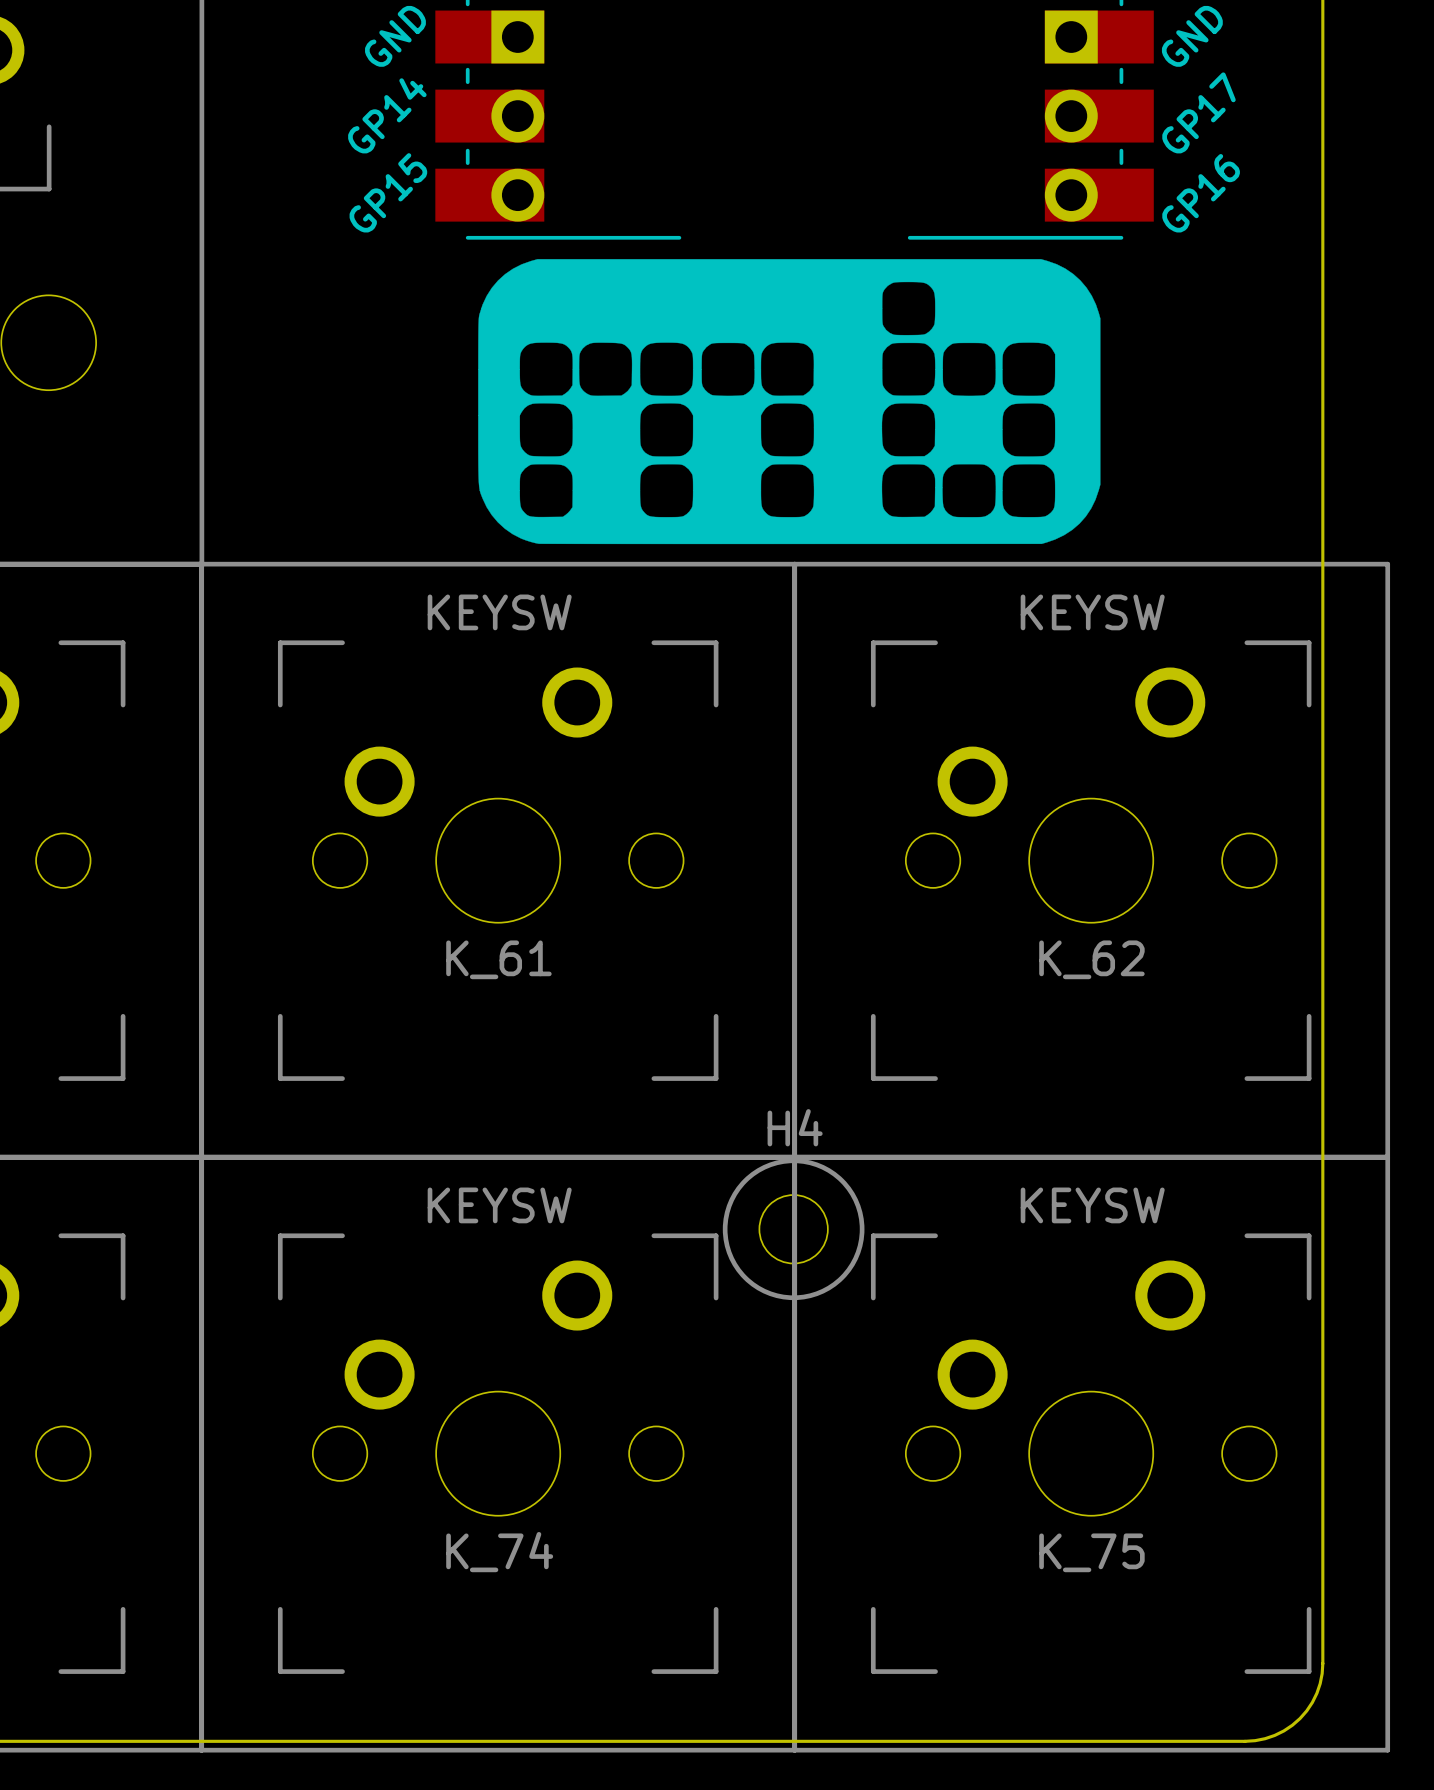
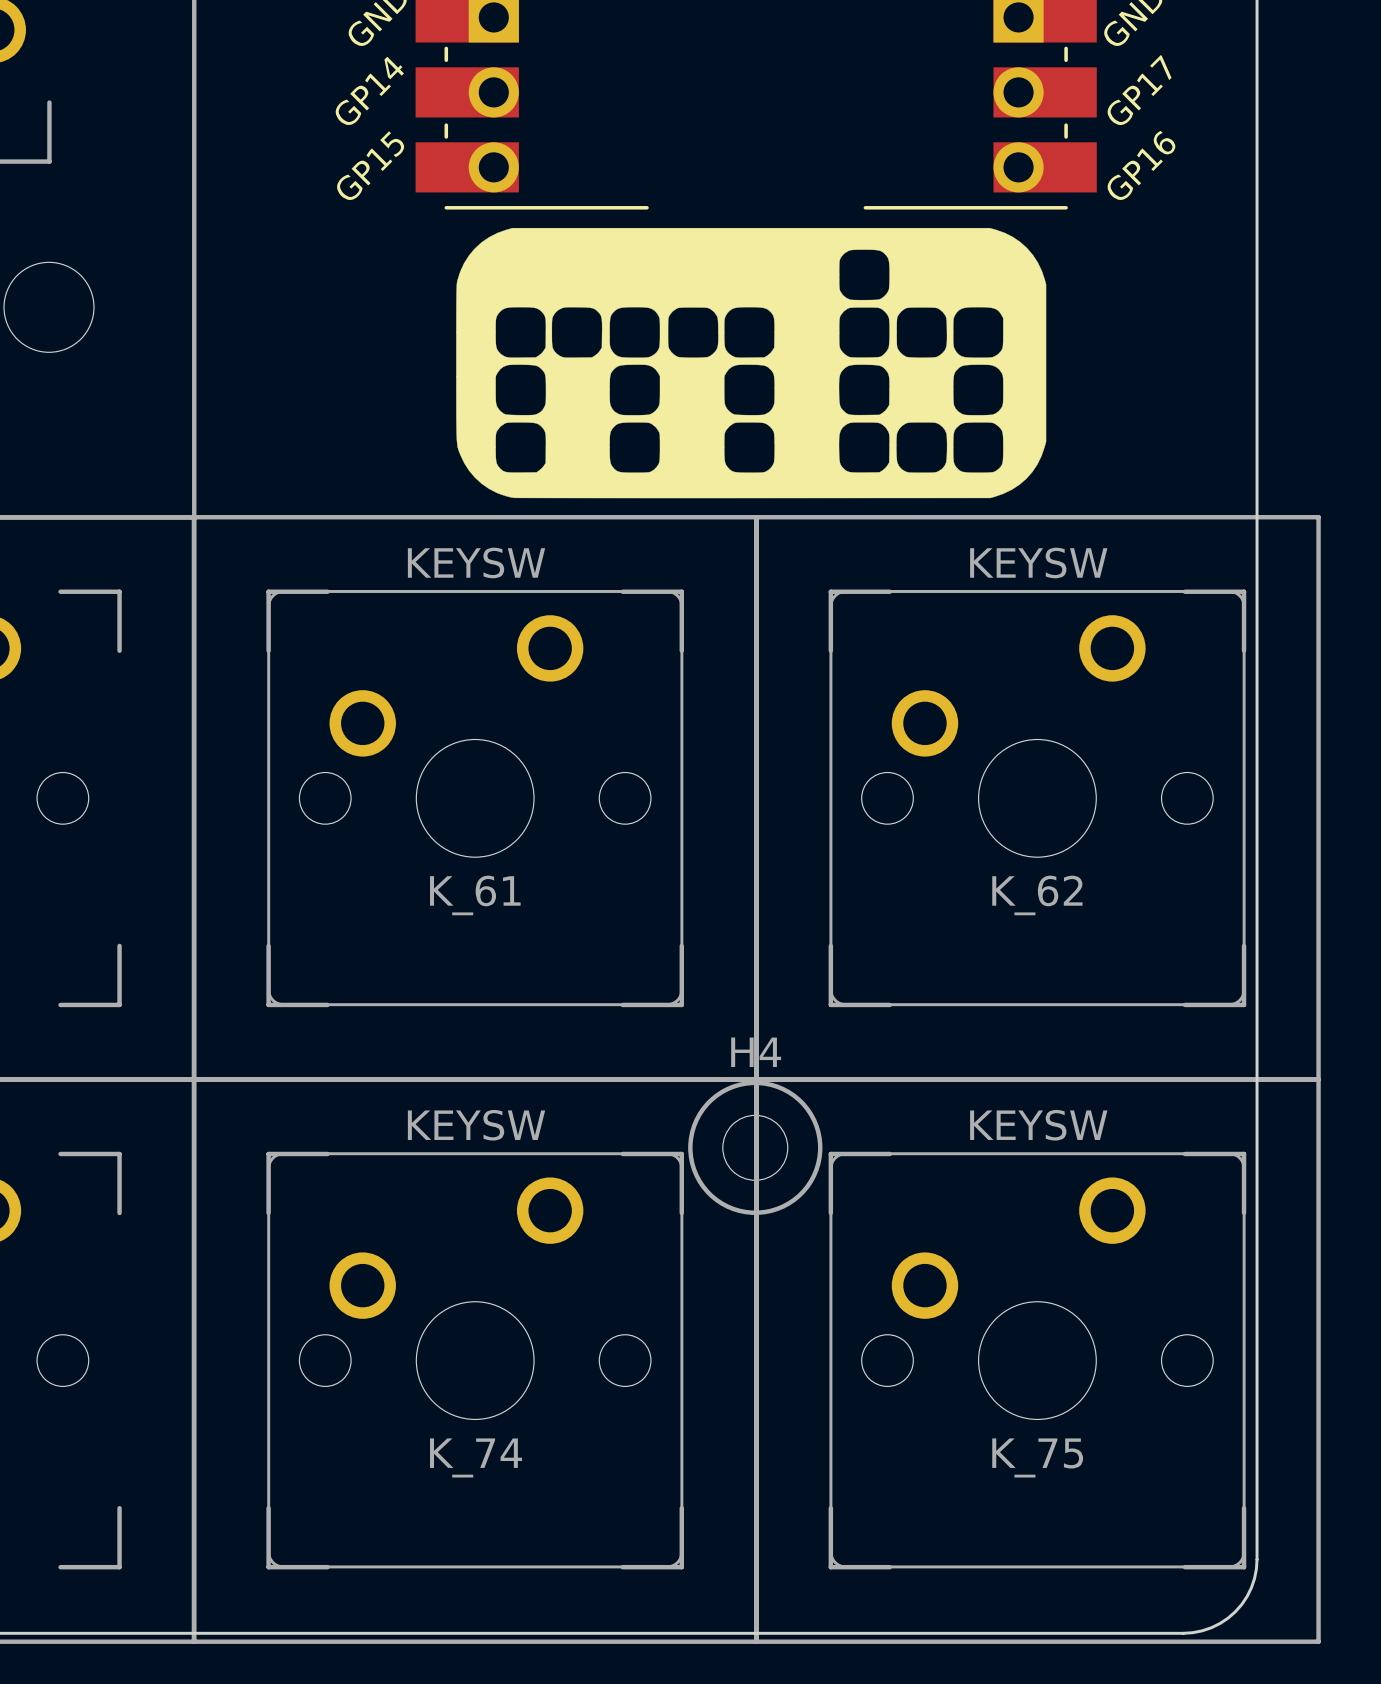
line: none -> (283, 591) (667, 591) (677, 595) (681, 606) (681, 989) (677, 1000) (667, 1004) (283, 1004) (273, 1000) (268, 989) (268, 606) (273, 595) (283, 591)
line: none -> (845, 591) (1229, 591) (1239, 595) (1244, 606) (1244, 989) (1239, 1000) (1229, 1004) (845, 1004) (835, 1000) (830, 989) (830, 606) (835, 595) (845, 591)
line: none -> (283, 1153) (667, 1153) (677, 1158) (681, 1168) (681, 1552) (677, 1562) (667, 1566) (283, 1566) (273, 1562) (268, 1552) (268, 1168) (273, 1158) (283, 1153)
line: none -> (845, 1153) (1229, 1153) (1239, 1158) (1244, 1168) (1244, 1552) (1239, 1562) (1229, 1566) (845, 1566) (835, 1562) (830, 1552) (830, 1168) (835, 1158) (845, 1153)

